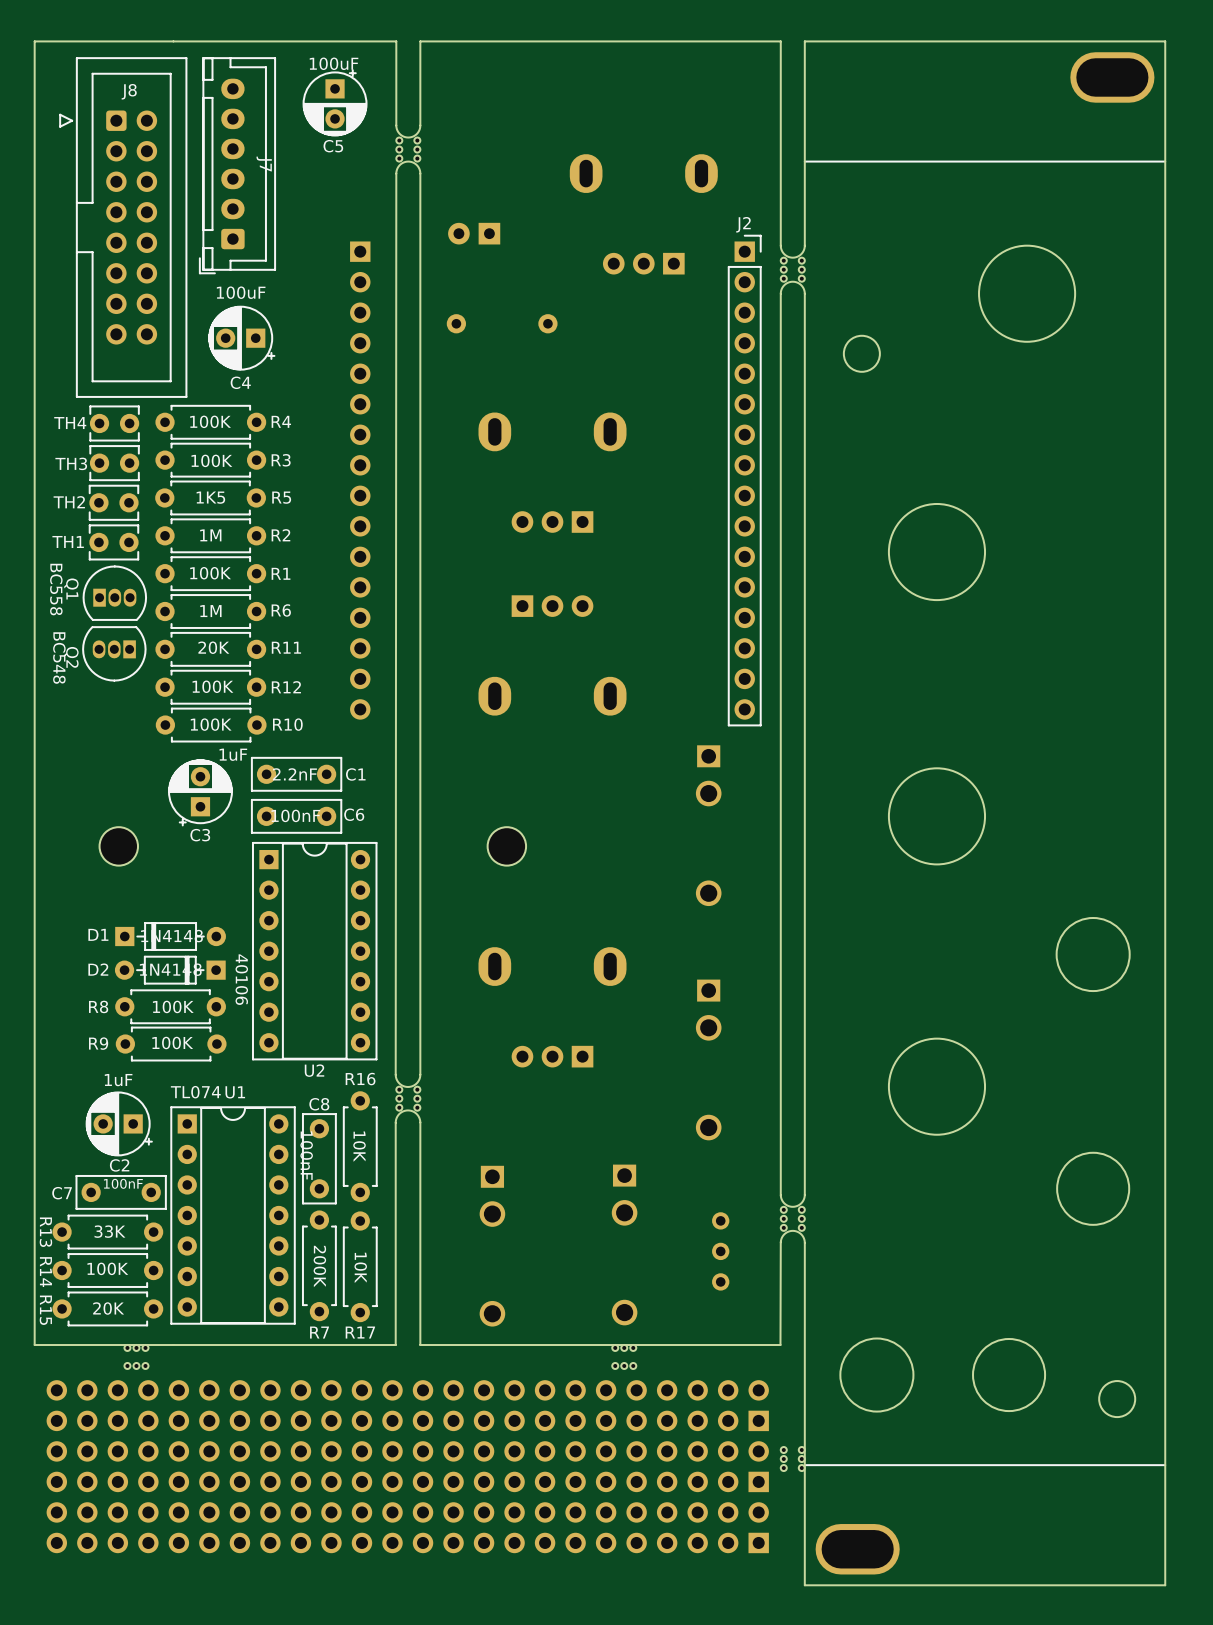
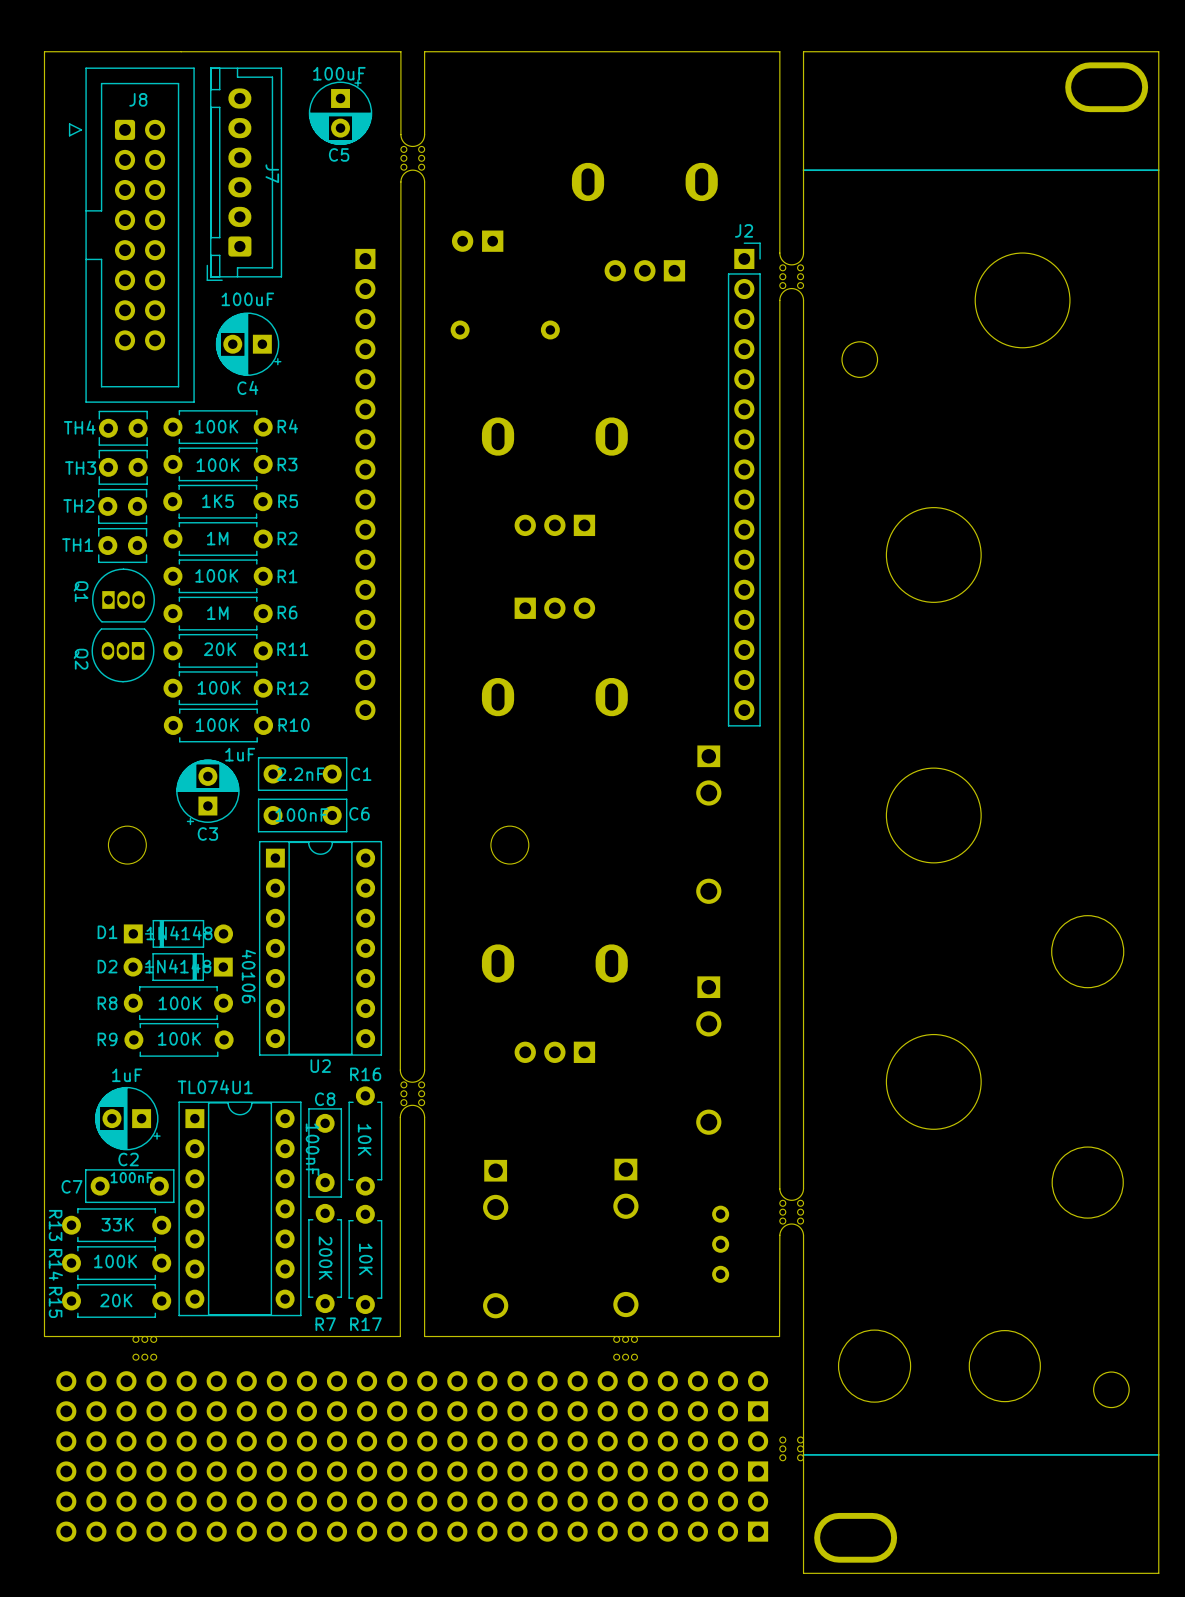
Q1 value: BC558 (56, 589) -> none
Q2 value: BC548 (59, 658) -> none

